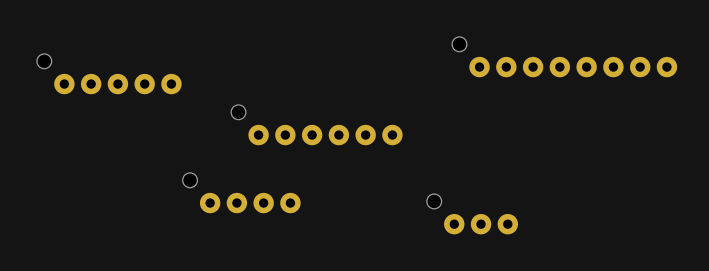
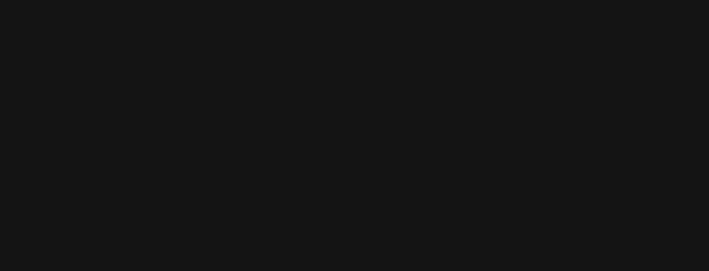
part: (564, 57) -> none
part: (109, 74) -> none
part: (316, 125) -> none
part: (241, 193) -> none
part: (472, 214) -> none

